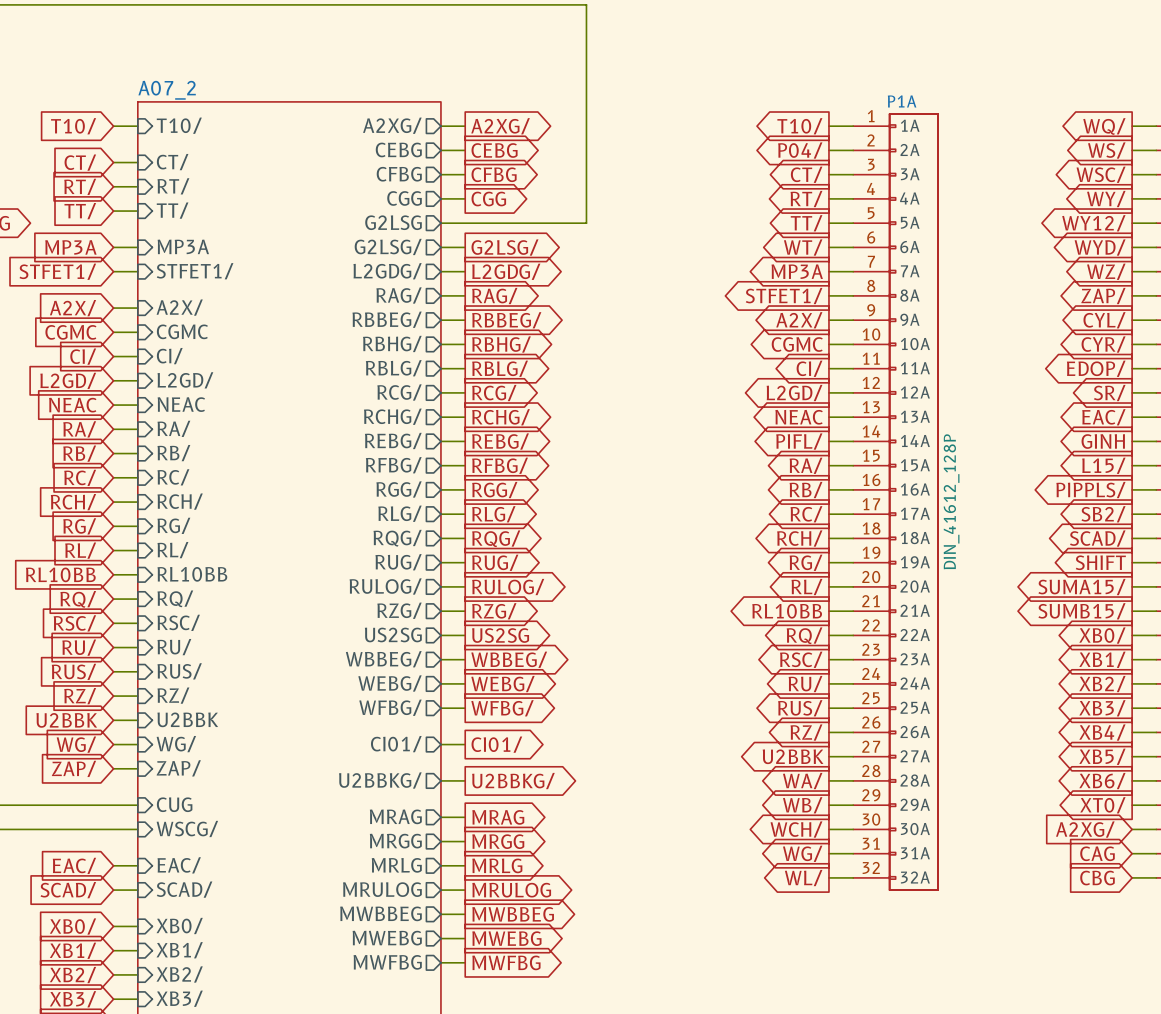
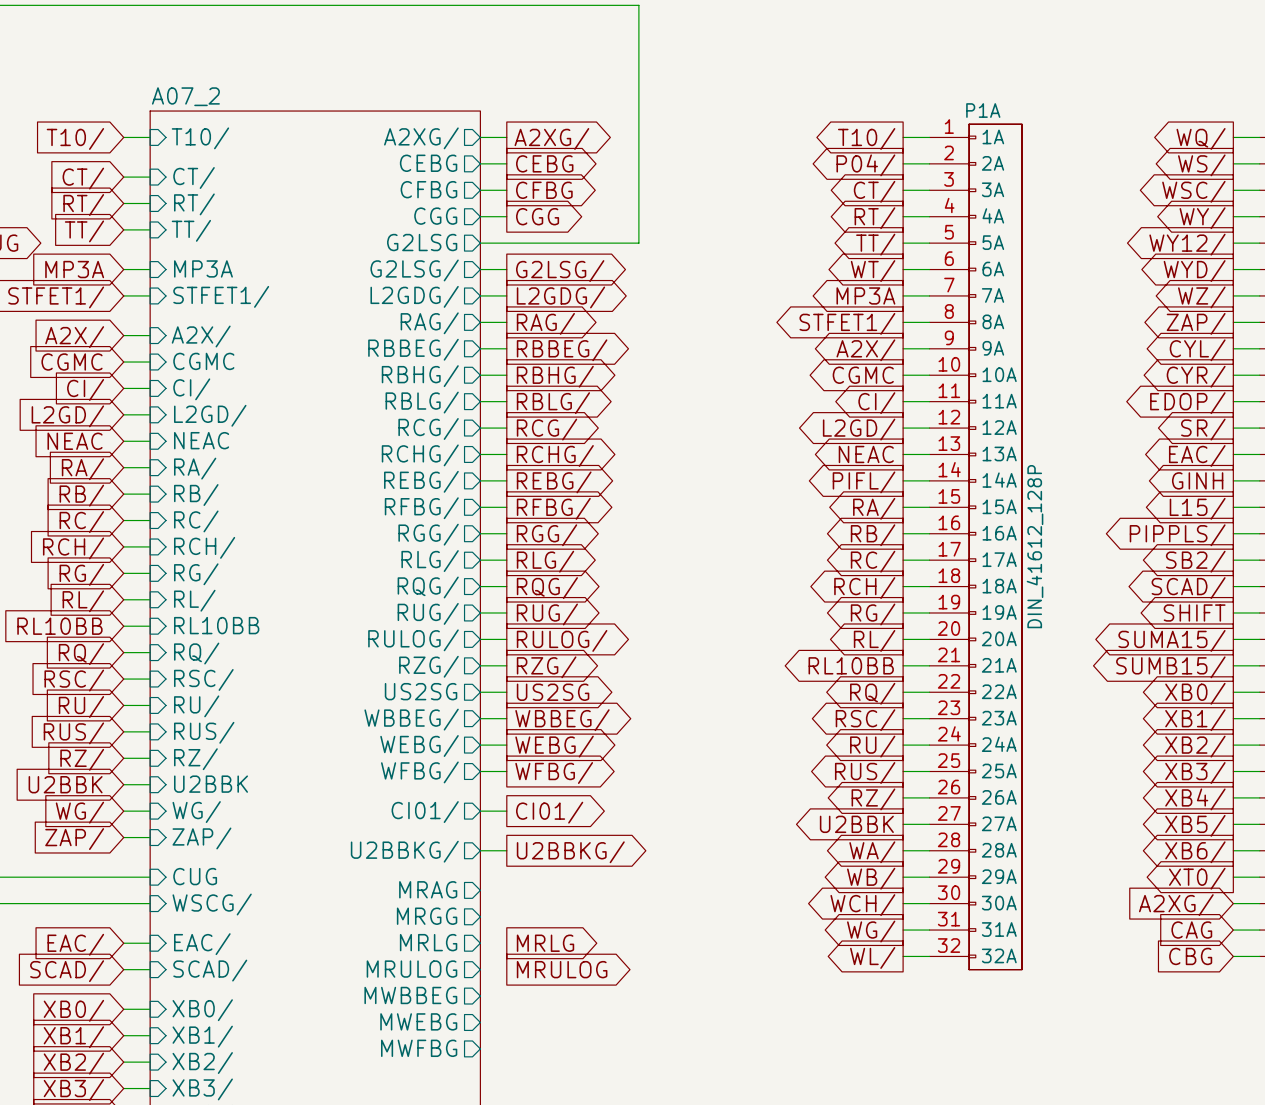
wire: (440, 817) (465, 817) -> none
global label: MRAG (498, 817) -> none
wire: (440, 841) (465, 841) -> none
global label: MRGG (498, 841) -> none
wire: (440, 865) (465, 865) -> none
wire: (440, 890) (465, 890) -> none
wire: (440, 914) (465, 914) -> none
global label: MWBBEG (513, 914) -> none
wire: (440, 938) (465, 938) -> none
global label: MWEBG (506, 938) -> none
wire: (440, 962) (465, 962) -> none
global label: MWFBG (506, 962) -> none

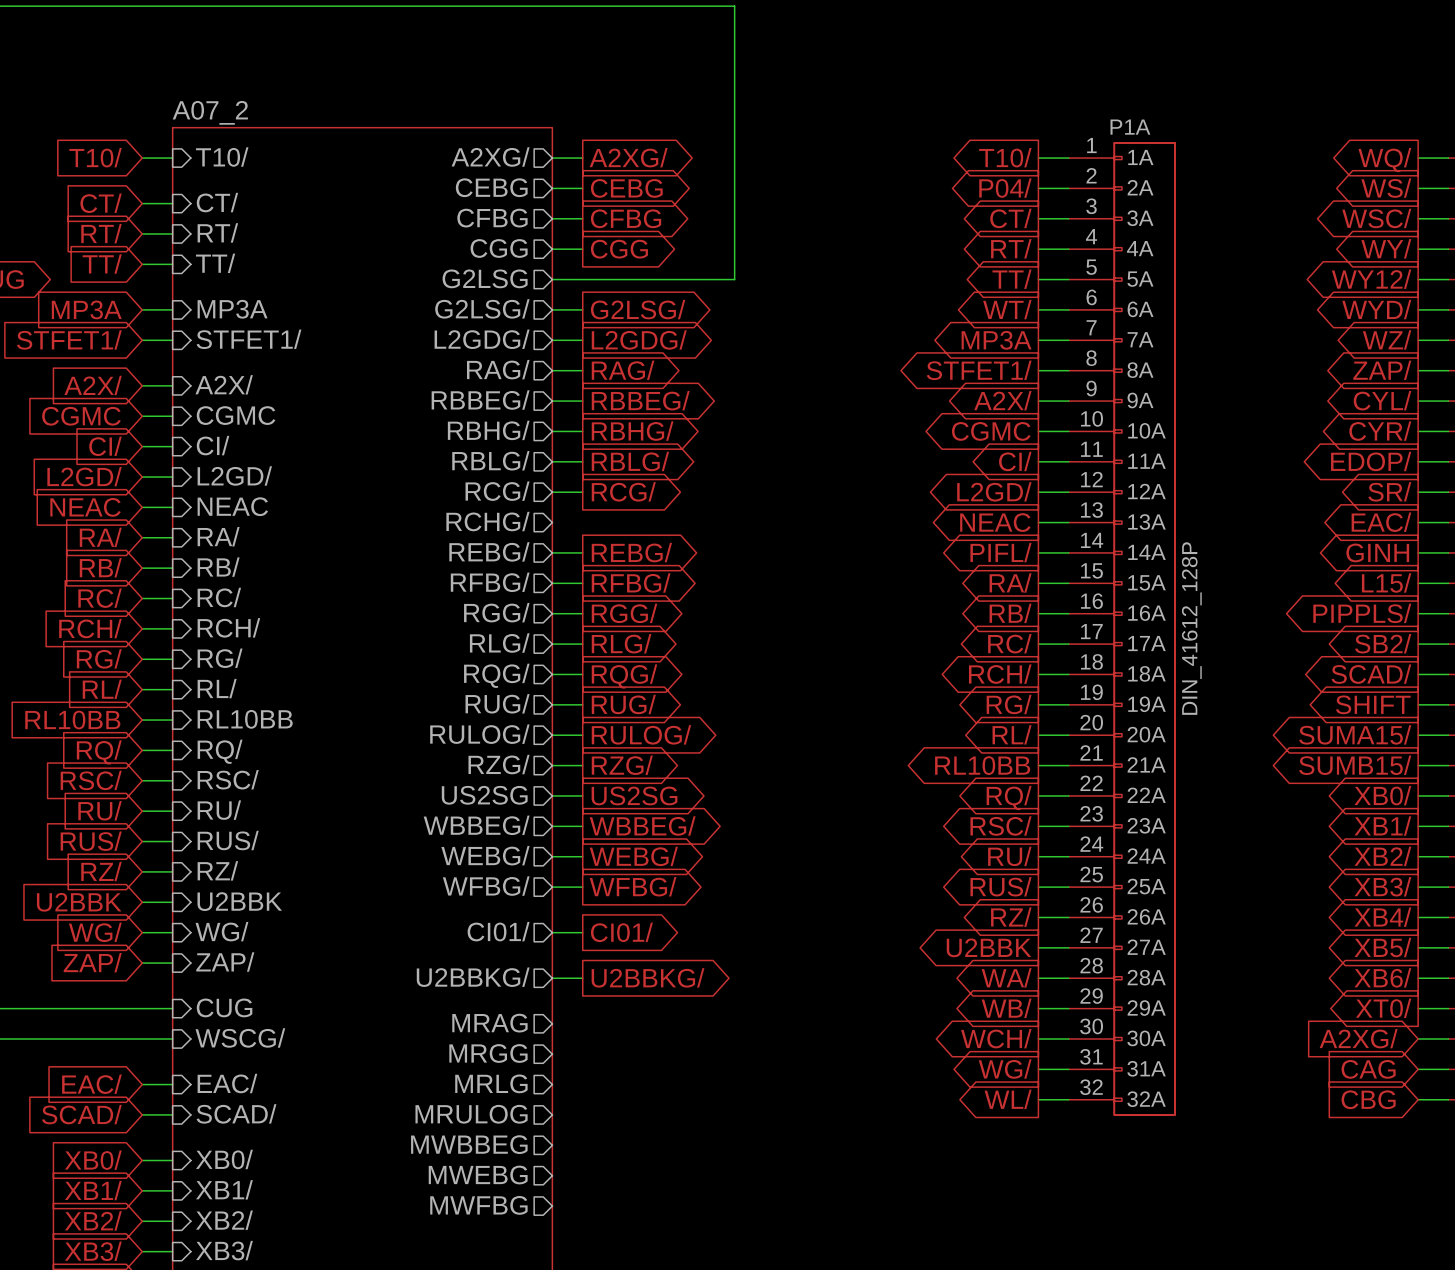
wire: (480, 454) (506, 454) -> none
global label: RCHG/ (555, 455) -> none
global label: MRLG (545, 943) -> none
global label: MRULOG (562, 969) -> none

